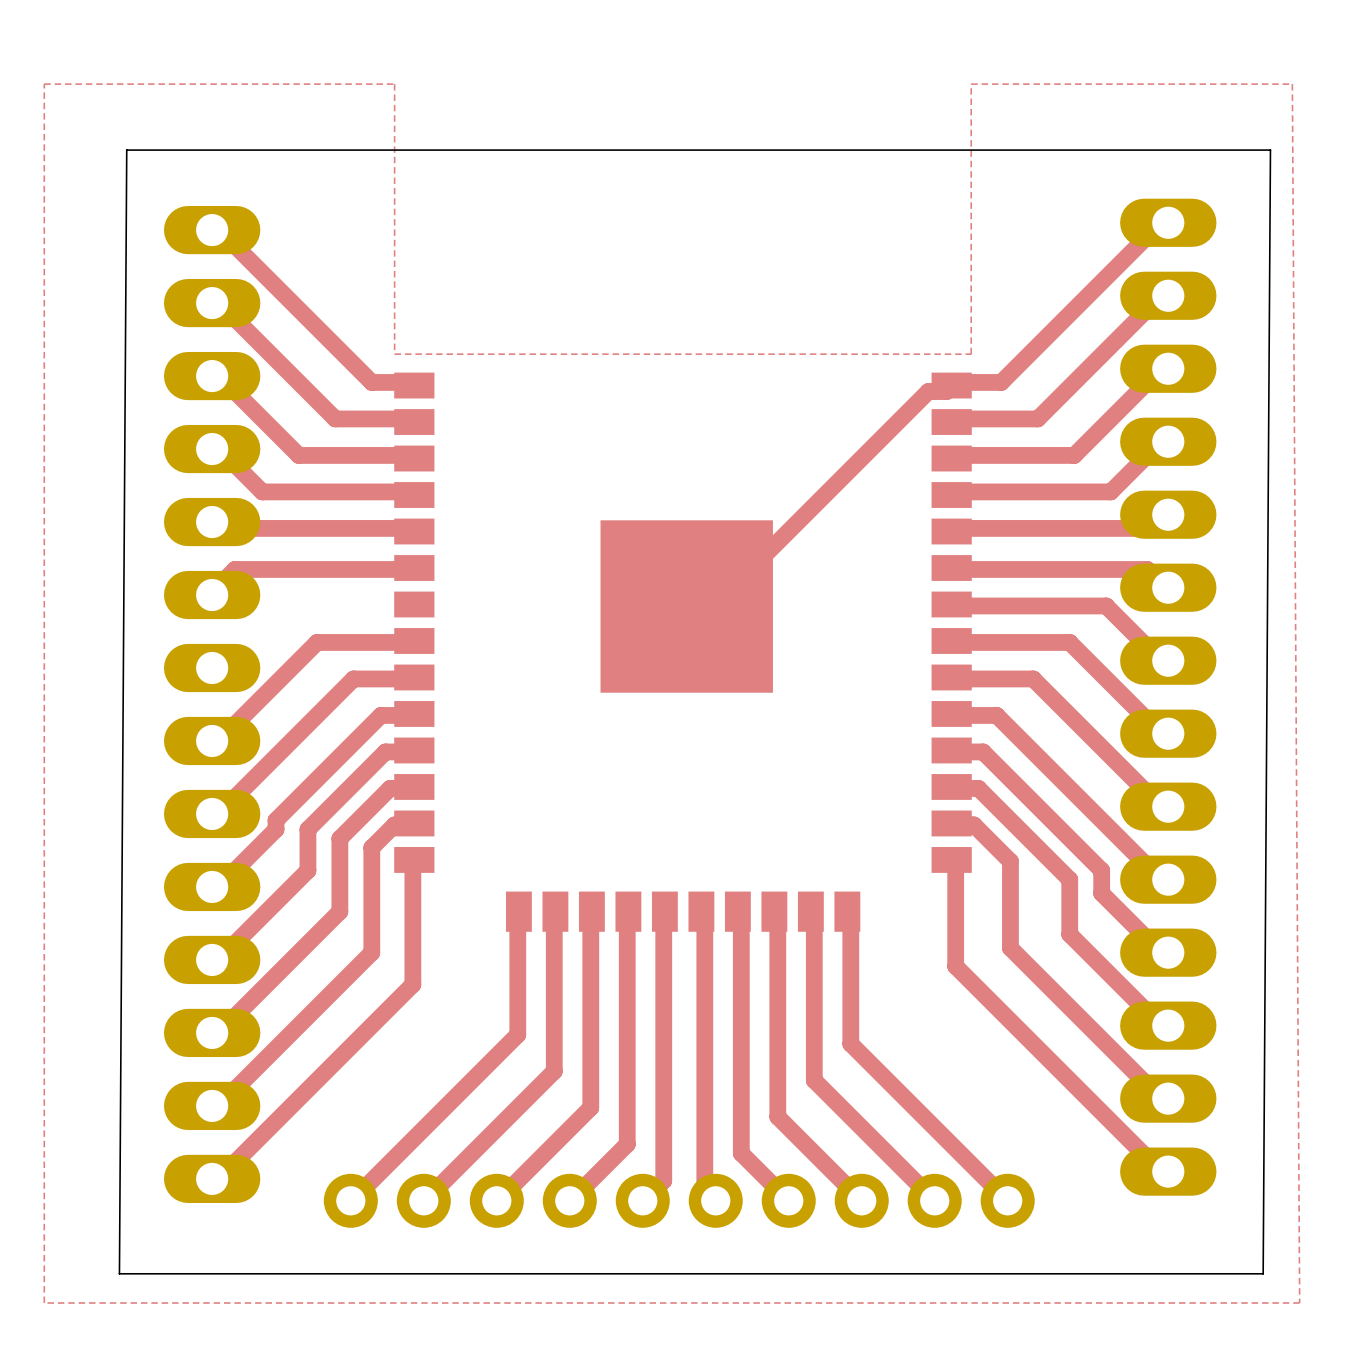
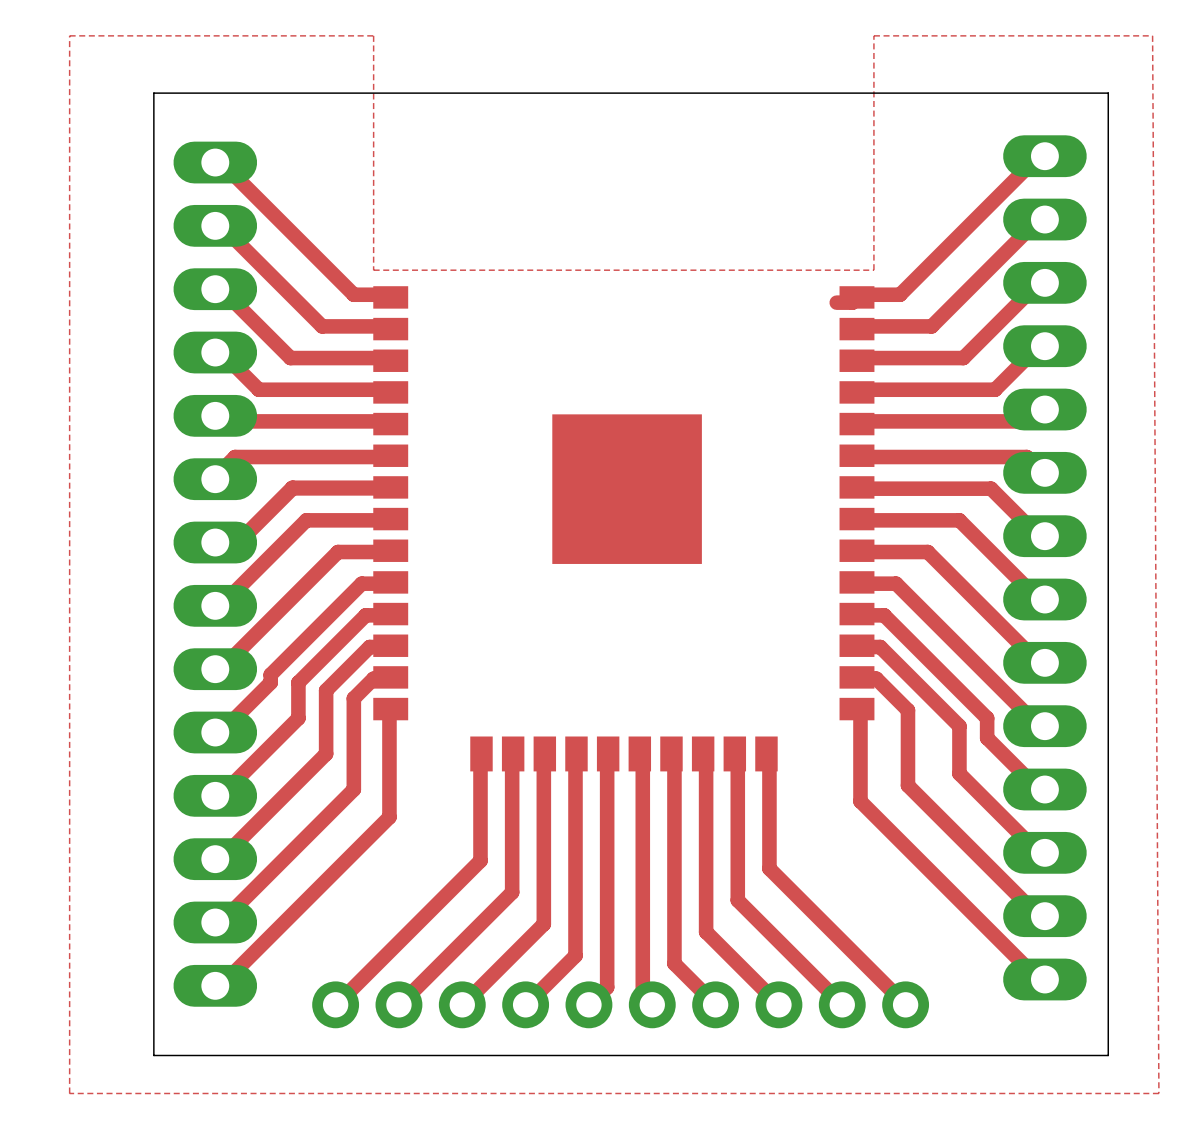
board edge: (1241, 150) (1270, 150) (1263, 1273) (119, 1273) (126, 150) (141, 150) -> (1108, 93) (1108, 1055) (153, 1055) (153, 93)
top track: (928, 391) (713, 605) -> none
top track: none -> (390, 487) (292, 488) (238, 542) (215, 542)

